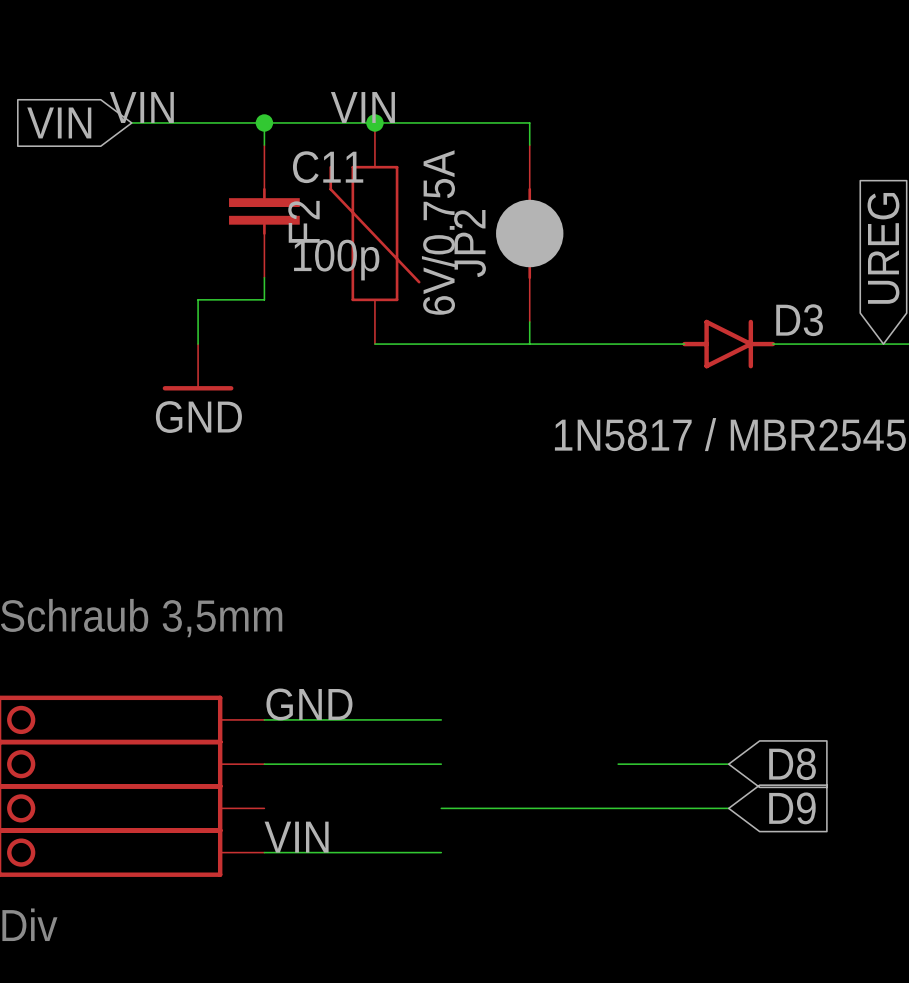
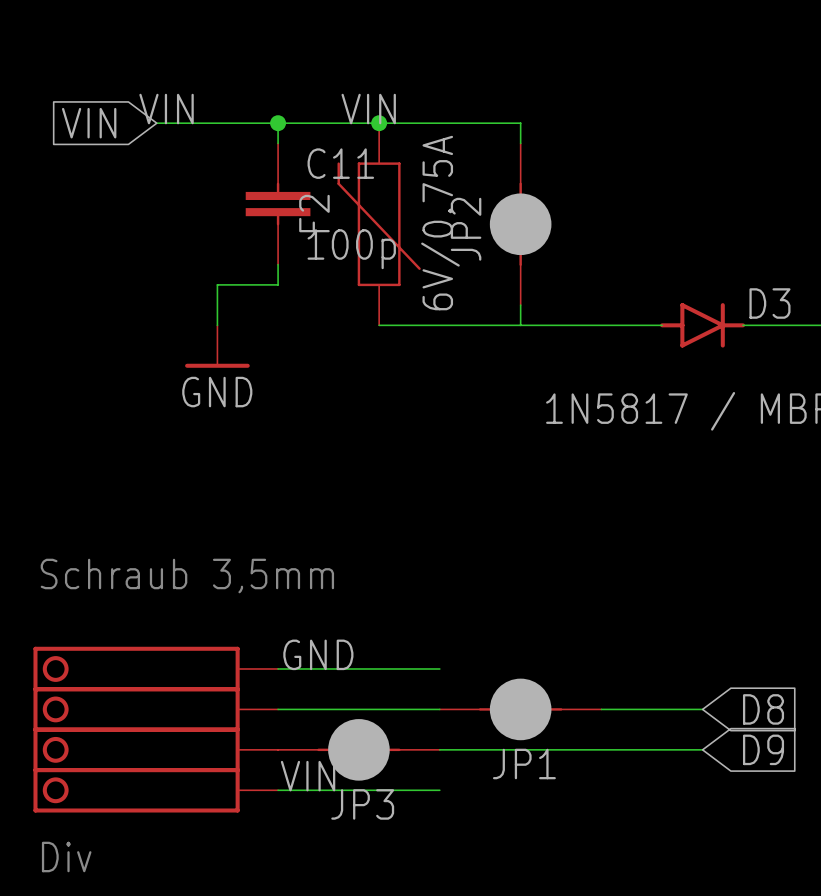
JP1: none -> (520, 709)
JP3: none -> (358, 749)

